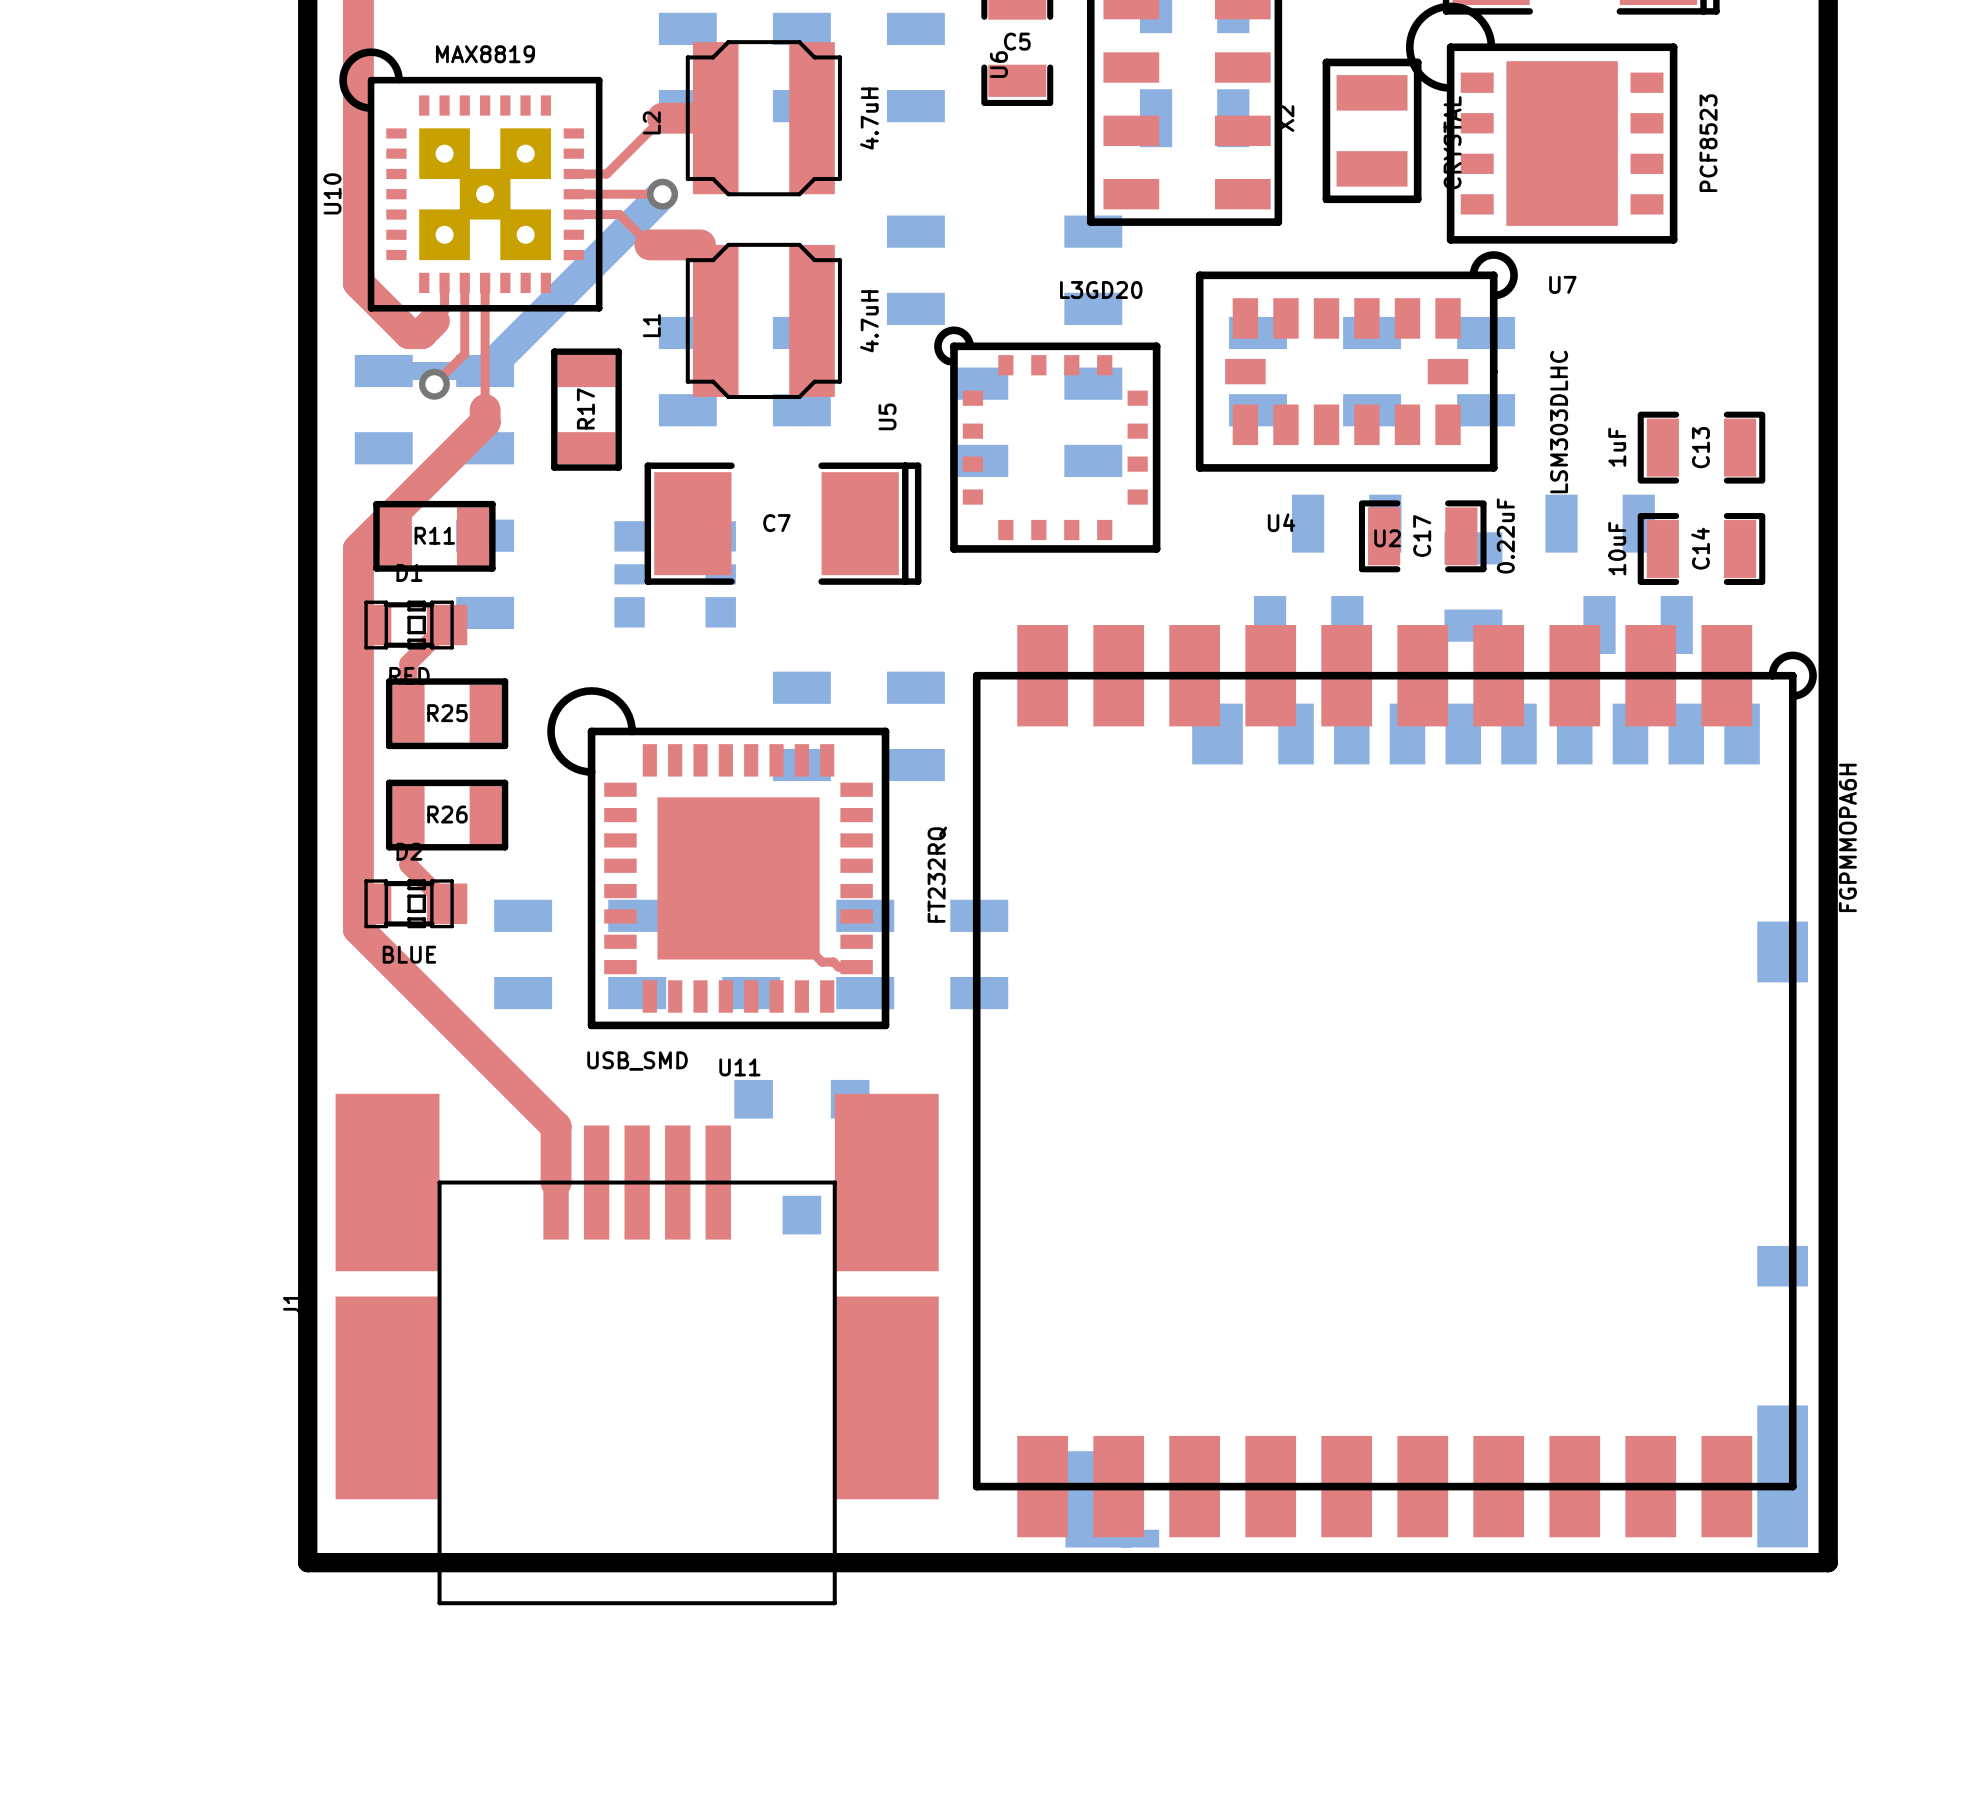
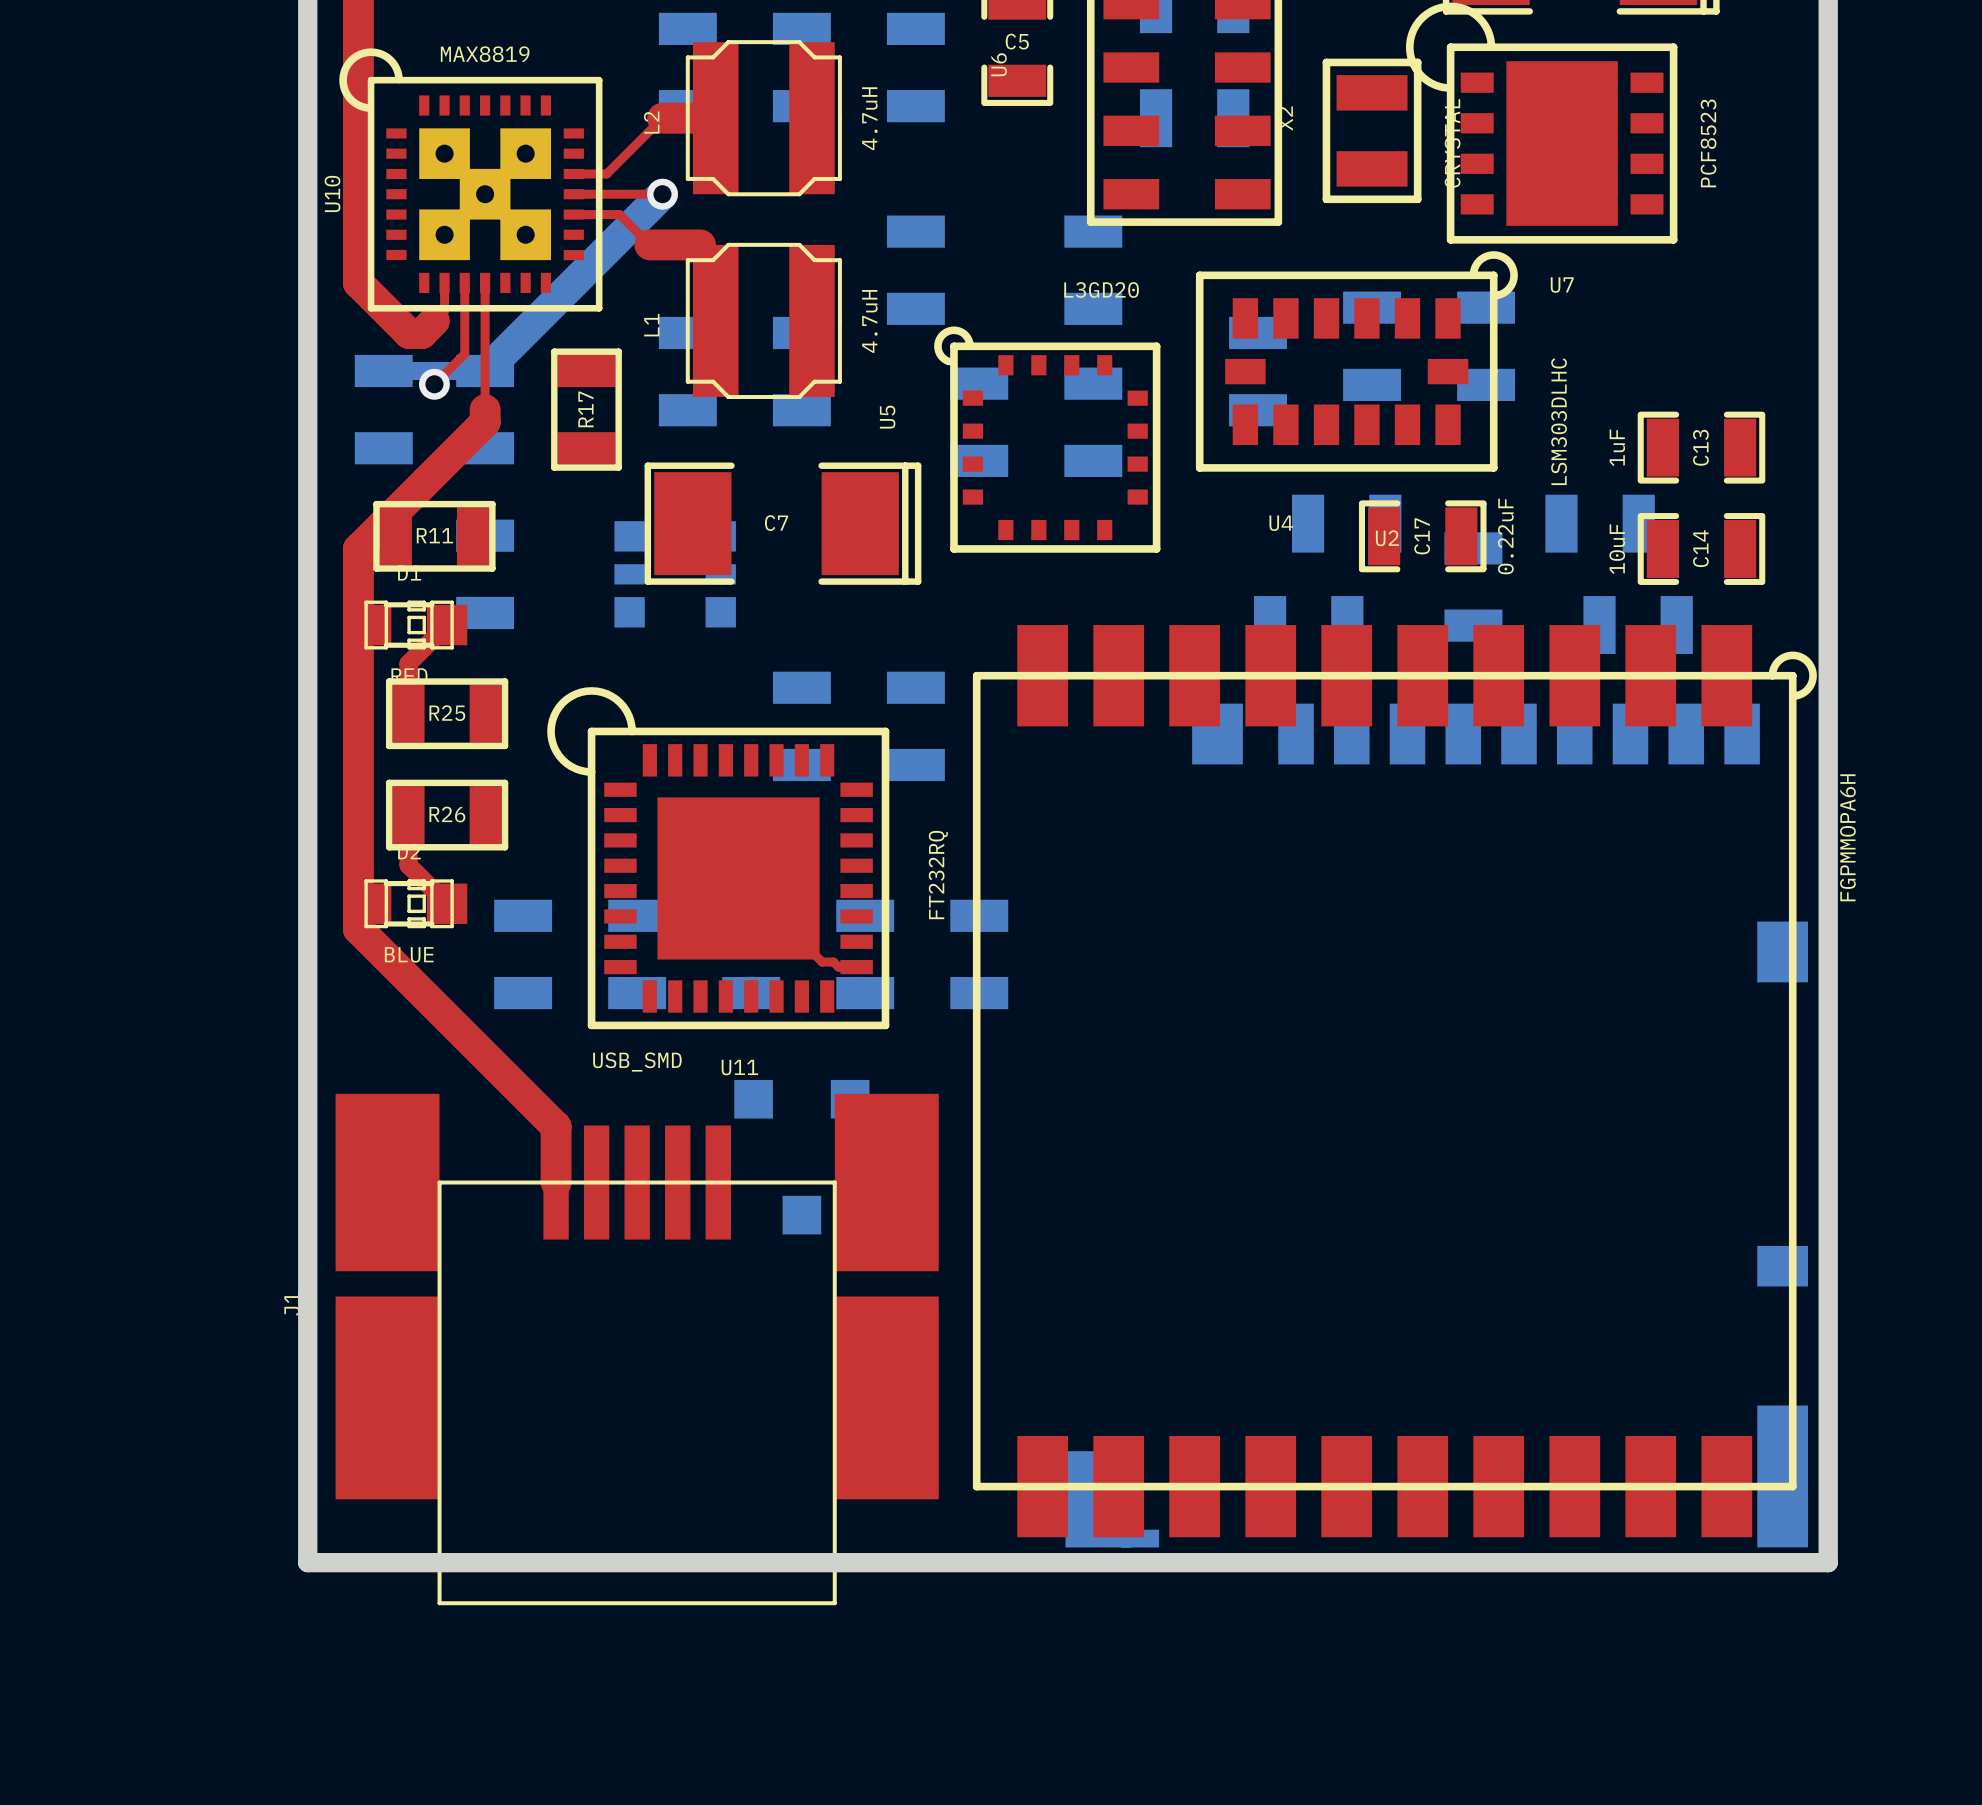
part position: (1372, 371) -> (1372, 346)
part position: (1486, 371) -> (1486, 346)

